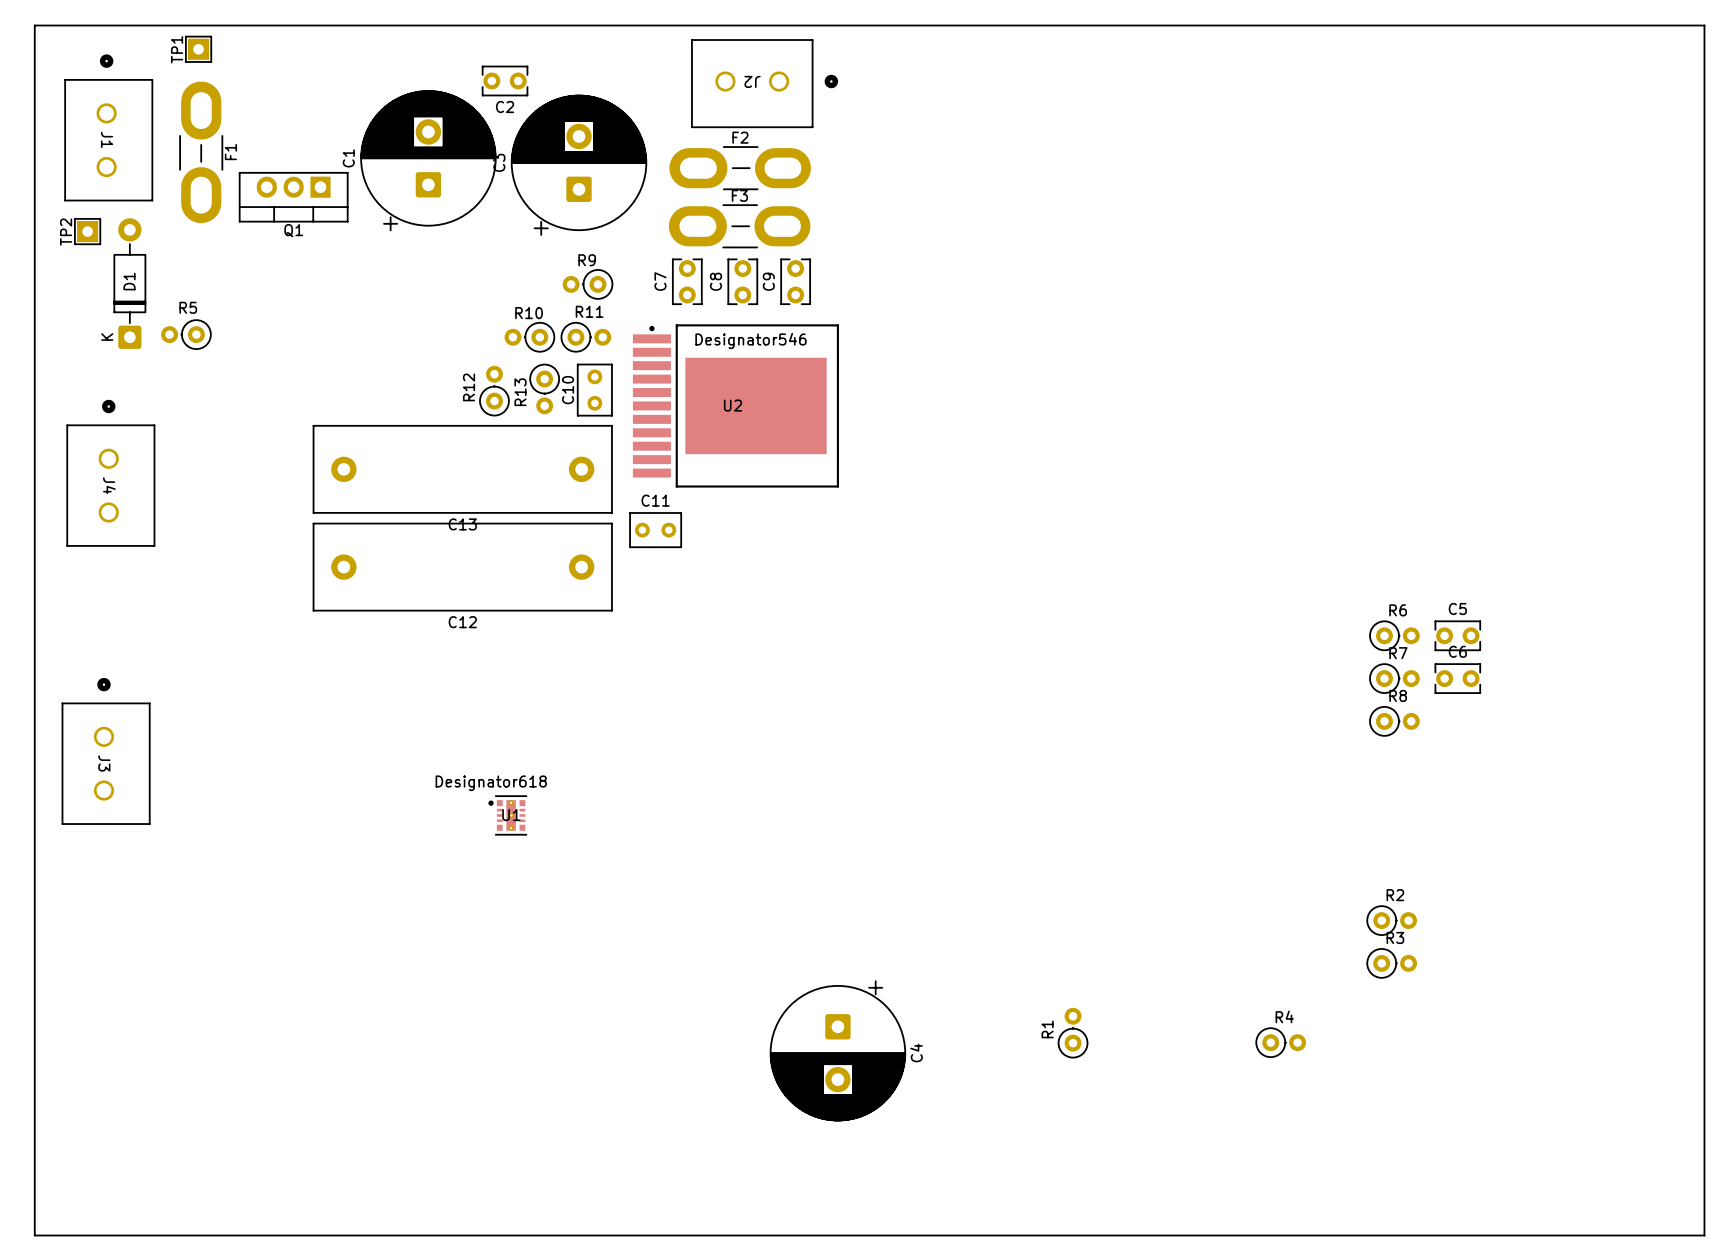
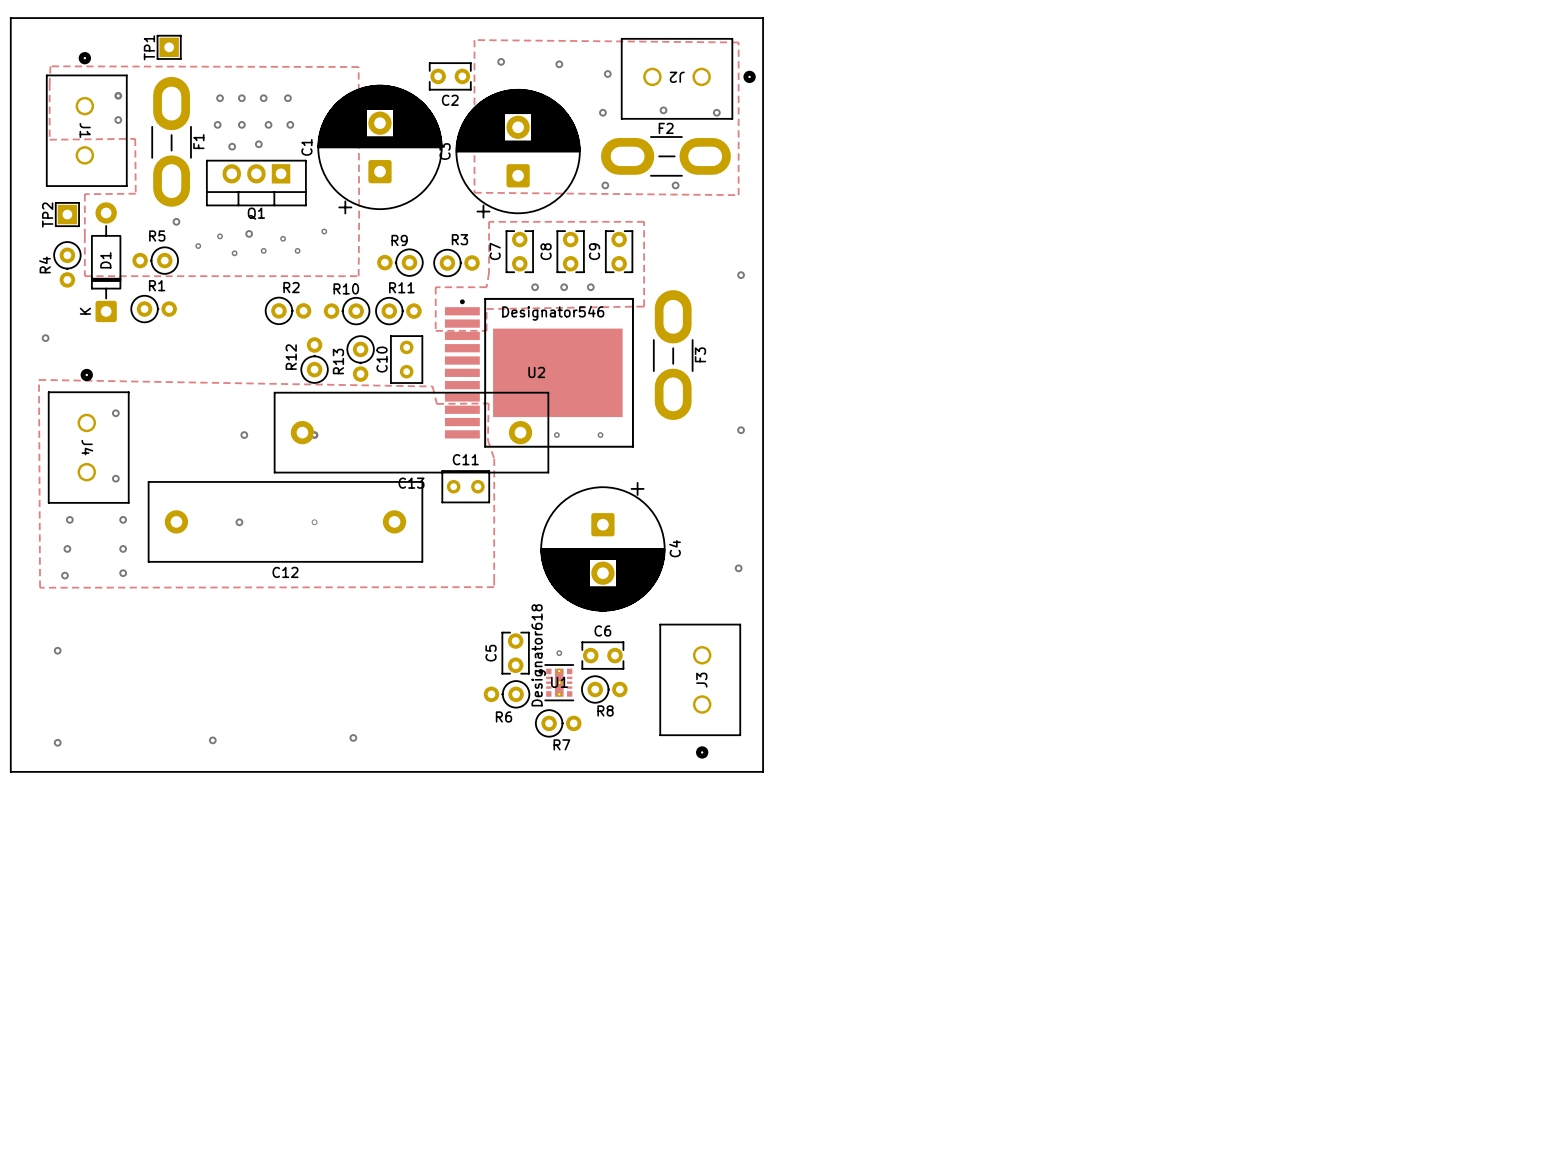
board edge: none -> (10, 18) (763, 18) (763, 771) (10, 771) (10, 18)
board edge: (34, 25) (1704, 25) (1704, 1235) (34, 1235) (34, 25) -> none
top zone outline: none -> (474, 40) (738, 42) (738, 195) (474, 192) (474, 40)
via: none -> (501, 61)
via: none -> (559, 64)
top zone outline: none -> (50, 66) (358, 67) (358, 276) (84, 276) (84, 194) (135, 193) (135, 138) (49, 139) (50, 66)
via: none -> (607, 73)
via: none -> (118, 95)
via: none -> (220, 98)
via: none -> (241, 98)
via: none -> (263, 98)
via: none -> (287, 98)
via: none -> (663, 110)
via: none -> (602, 112)
via: none -> (716, 112)
via: none -> (118, 120)
via: none -> (217, 124)
via: none -> (241, 124)
via: none -> (268, 124)
via: none -> (290, 124)
via: none -> (258, 144)
via: none -> (232, 146)
via: none -> (605, 185)
via: none -> (675, 185)
F3 rotation: 0° (739, 226) -> 90° clockwise (673, 355)
F3 position: (739, 226) -> (673, 355)
via: none -> (176, 221)
top zone outline: none -> (489, 221) (489, 272) (486, 287) (435, 287) (435, 330) (486, 330) (486, 309) (644, 306) (644, 221) (489, 221)
via: none -> (324, 231)
via: none -> (249, 233)
via: none -> (220, 236)
via: none -> (283, 238)
via: none -> (198, 246)
via: none -> (263, 250)
via: none -> (297, 250)
via: none -> (234, 253)
C7 position: (687, 281) -> (519, 251)
C8 position: (742, 281) -> (570, 251)
C9 position: (795, 281) -> (619, 251)
R9 position: (587, 284) -> (400, 262)
via: none -> (741, 275)
via: none -> (535, 287)
via: none -> (564, 287)
via: none -> (590, 287)
R5 position: (186, 334) -> (155, 260)
R10 position: (529, 337) -> (346, 311)
R11 position: (586, 337) -> (398, 311)
via: none -> (45, 338)
R13 position: (544, 389) -> (360, 358)
R12 position: (494, 390) -> (314, 360)
C10 position: (594, 390) -> (406, 359)
U2 position: (735, 405) -> (539, 372)
top zone outline: none -> (38, 379) (432, 386) (436, 403) (488, 403) (487, 440) (494, 458) (494, 587) (40, 587) (38, 379)
via: none -> (115, 413)
via: none -> (741, 430)
via: none -> (244, 435)
via: none -> (314, 435)
via: none -> (556, 435)
via: none -> (600, 435)
via: none -> (115, 478)
C11 position: (655, 530) -> (465, 486)
via: none -> (69, 519)
via: none -> (123, 519)
via: none -> (239, 522)
via: none -> (314, 522)
C12 position: (462, 567) -> (285, 521)
via: none -> (67, 548)
via: none -> (123, 548)
C5 name position: C5 (1457, 608) -> C5 (491, 653)
via: none -> (738, 568)
via: none -> (123, 573)
via: none -> (64, 575)
R6 rotation: 0° (1394, 635) -> 180° (506, 694)
R6 position: (1394, 635) -> (506, 694)
C5 rotation: 0° (1457, 635) -> 90° clockwise (515, 653)
C5 position: (1457, 635) -> (515, 653)
R7 name position: R7 (1398, 653) -> R7 (561, 744)
R7 position: (1394, 678) -> (558, 723)
C6 position: (1457, 678) -> (602, 655)
R8 name position: R8 (1398, 695) -> R8 (605, 710)
via: none -> (57, 650)
via: none -> (559, 653)
R8 position: (1394, 721) -> (604, 689)
J3 rotation: 0° (106, 751) -> 180° (700, 691)
J3 position: (106, 751) -> (700, 691)
U1 text rotation: 0° (491, 783) -> 90° counterclockwise (538, 655)
via: none -> (353, 737)
via: none -> (212, 740)
via: none -> (57, 742)
U1 position: (507, 815) -> (556, 682)
R2 position: (1391, 920) -> (288, 310)
R3 position: (1391, 963) -> (456, 263)
R4 name position: R4 (1284, 1016) -> R4 (44, 264)
R1 rotation: 0° (1073, 1033) -> 90° clockwise (153, 309)
R1 position: (1073, 1033) -> (153, 309)
R4 rotation: 0° (1280, 1042) -> 90° clockwise (67, 264)
R4 position: (1280, 1042) -> (67, 264)
C4 position: (837, 1050) -> (602, 546)

